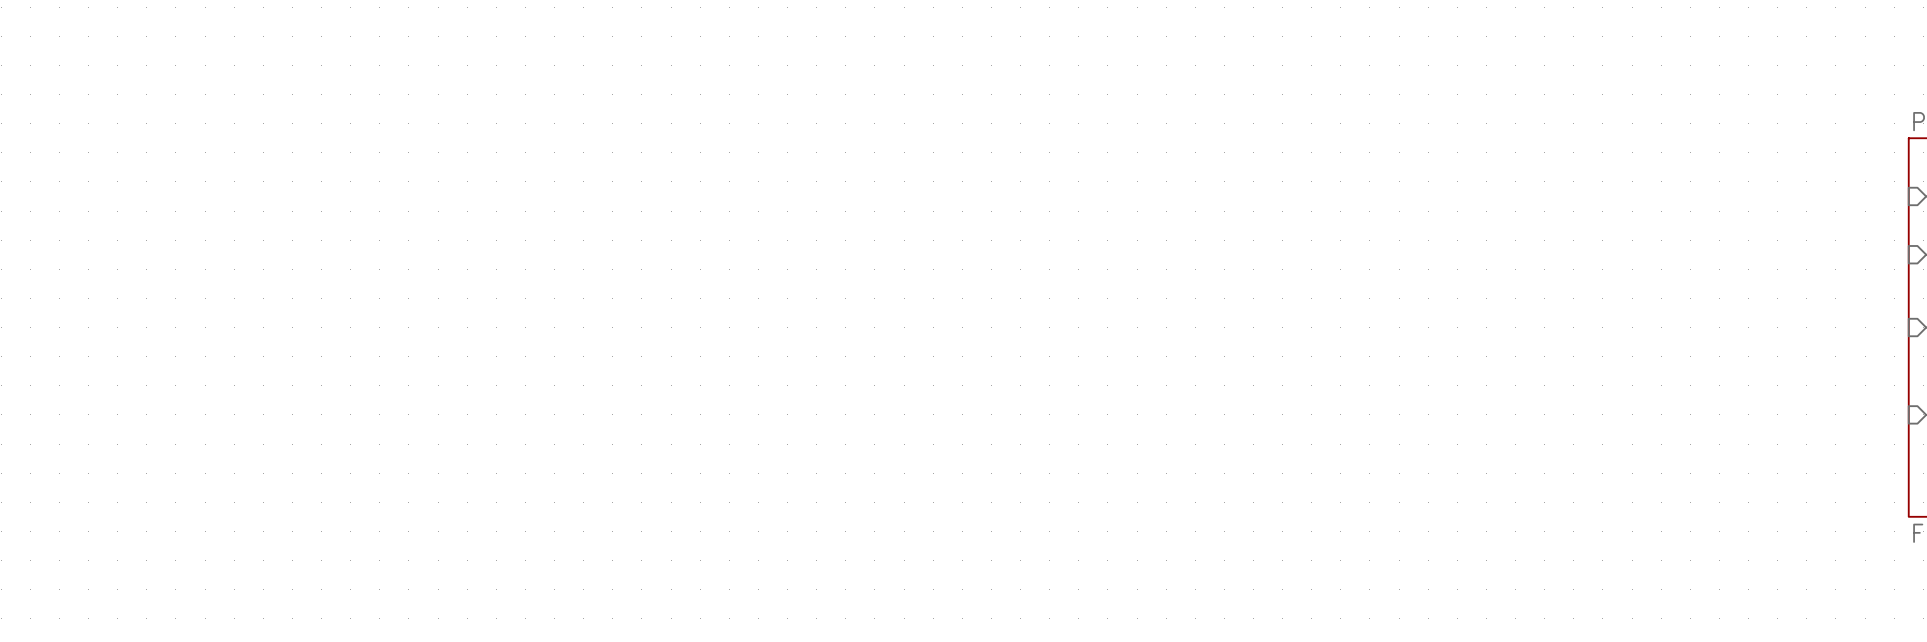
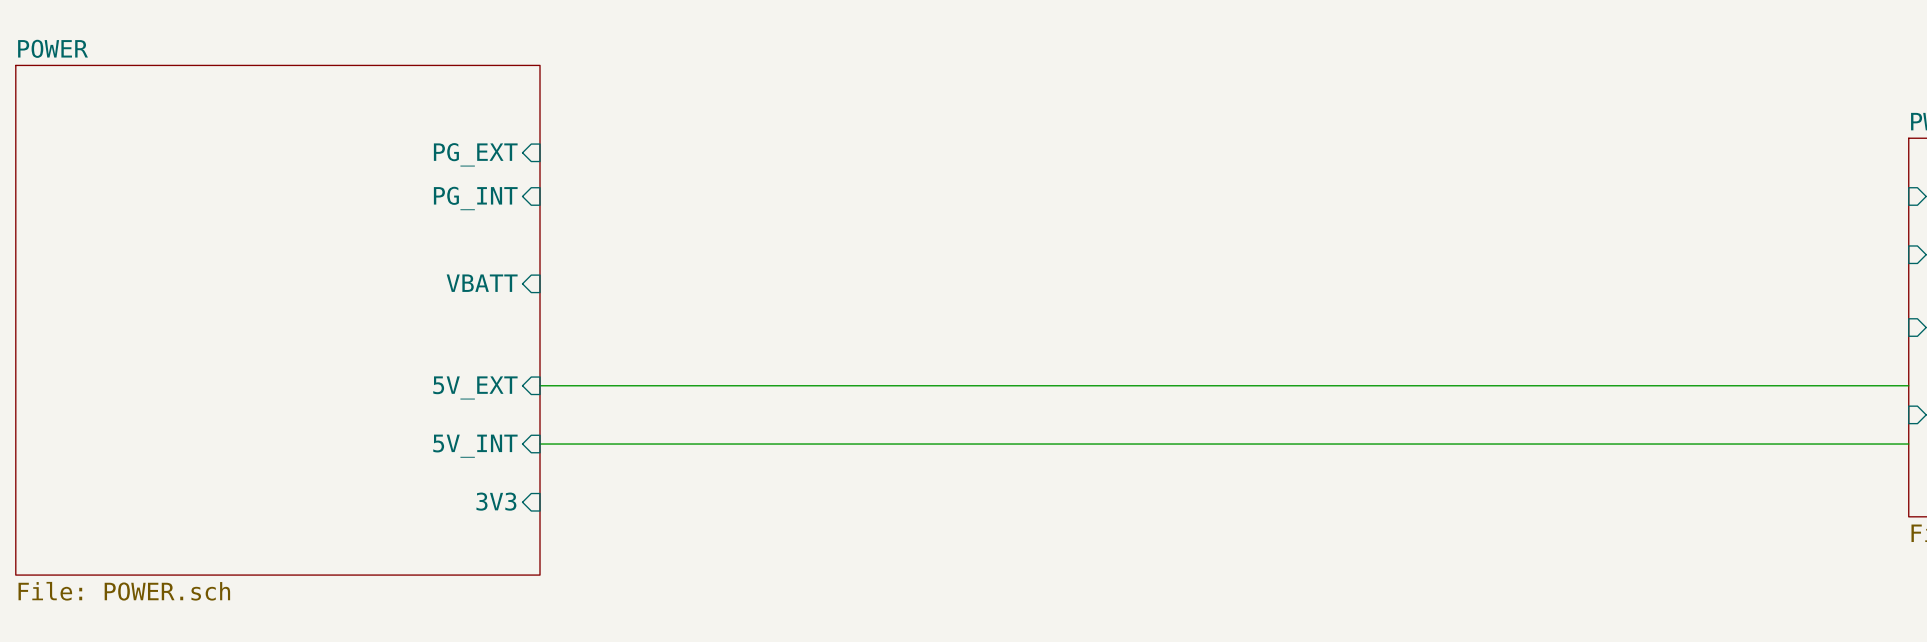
sheet pin: none -> PG_EXT (475, 154)
sheet pin: none -> PG_INT (475, 198)
sheet pin: none -> VBATT (482, 283)
sheet POWER: none -> File: POWER.sch (277, 320)
sheet pin: none -> 5V_EXT (475, 387)
wire: none -> (540, 385) (1908, 385)
sheet pin: none -> 5V_INT (475, 446)
wire: none -> (540, 444) (1908, 444)
sheet pin: none -> 3V3 (496, 501)

